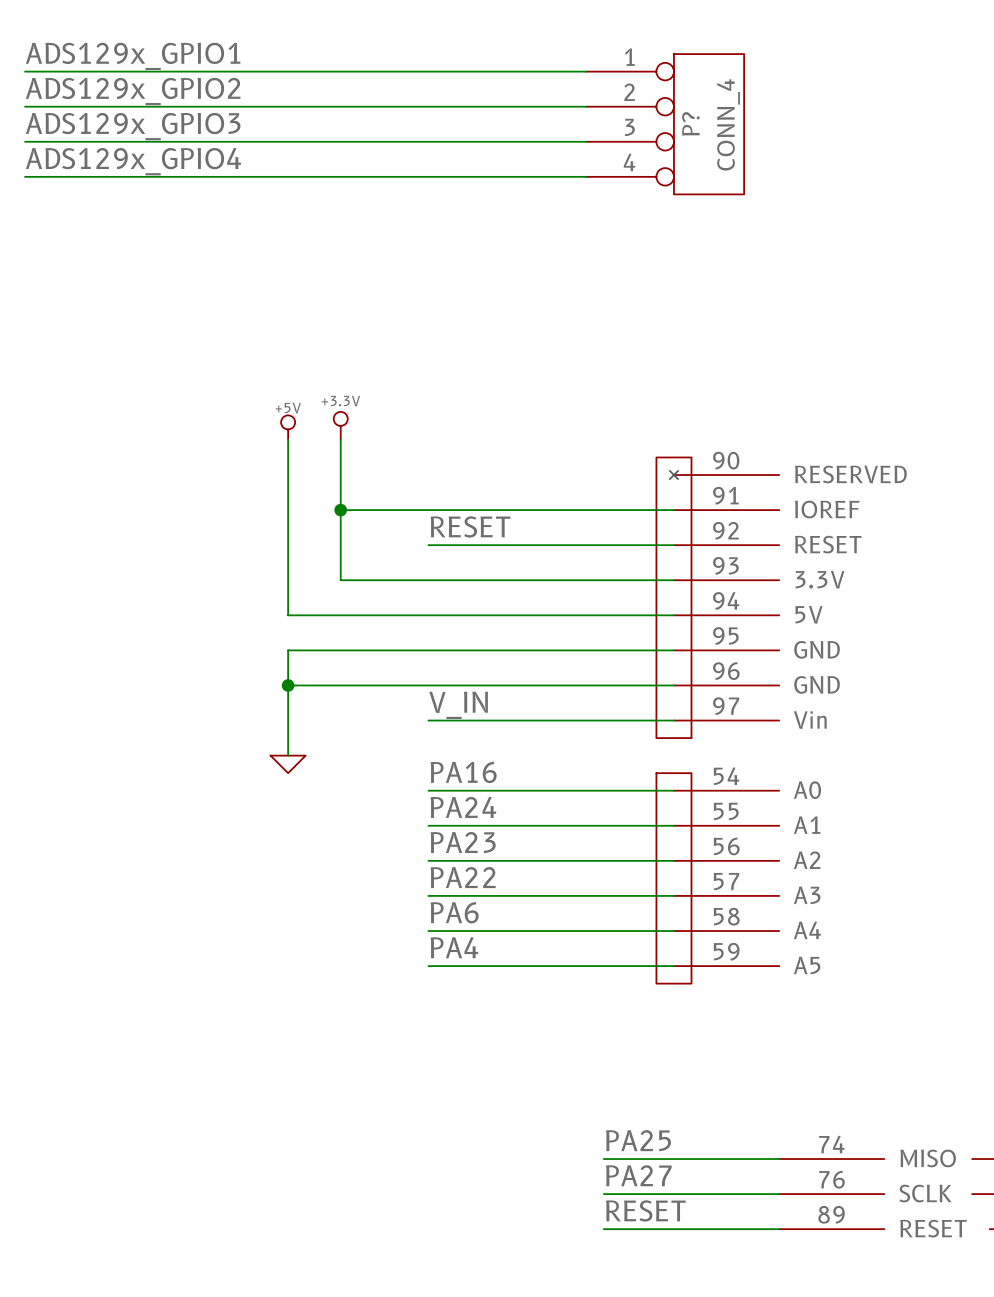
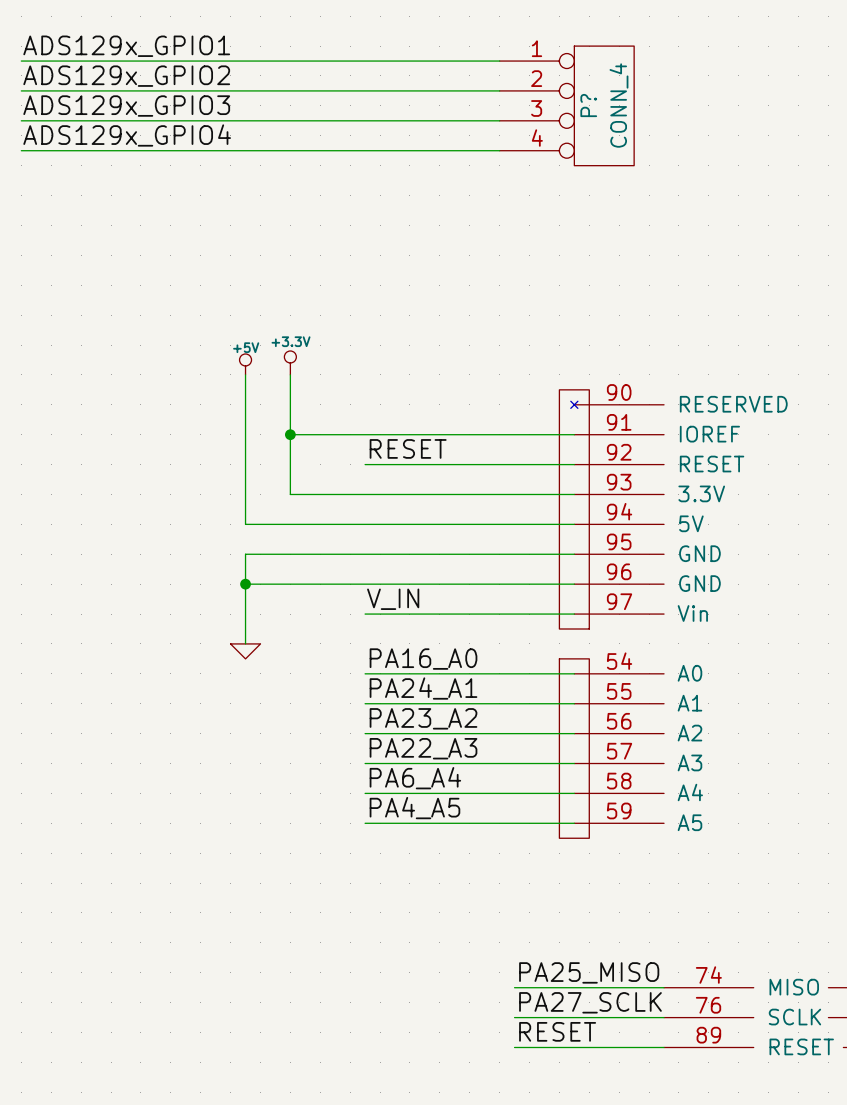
label: PA16 (463, 772) -> PA16_A0 (423, 659)
label: PA24 (463, 807) -> PA24_A1 (423, 688)
label: PA23 (463, 842) -> PA23_A2 (423, 718)
label: PA22 (463, 877) -> PA22_A3 (423, 748)
label: PA6 (454, 912) -> PA6_A4 (415, 778)
label: PA4 (454, 947) -> PA4_A5 (414, 808)
label: PA25 (638, 1140) -> PA25_MISO (589, 972)
label: PA27 (638, 1175) -> PA27_SCLK (590, 1002)

